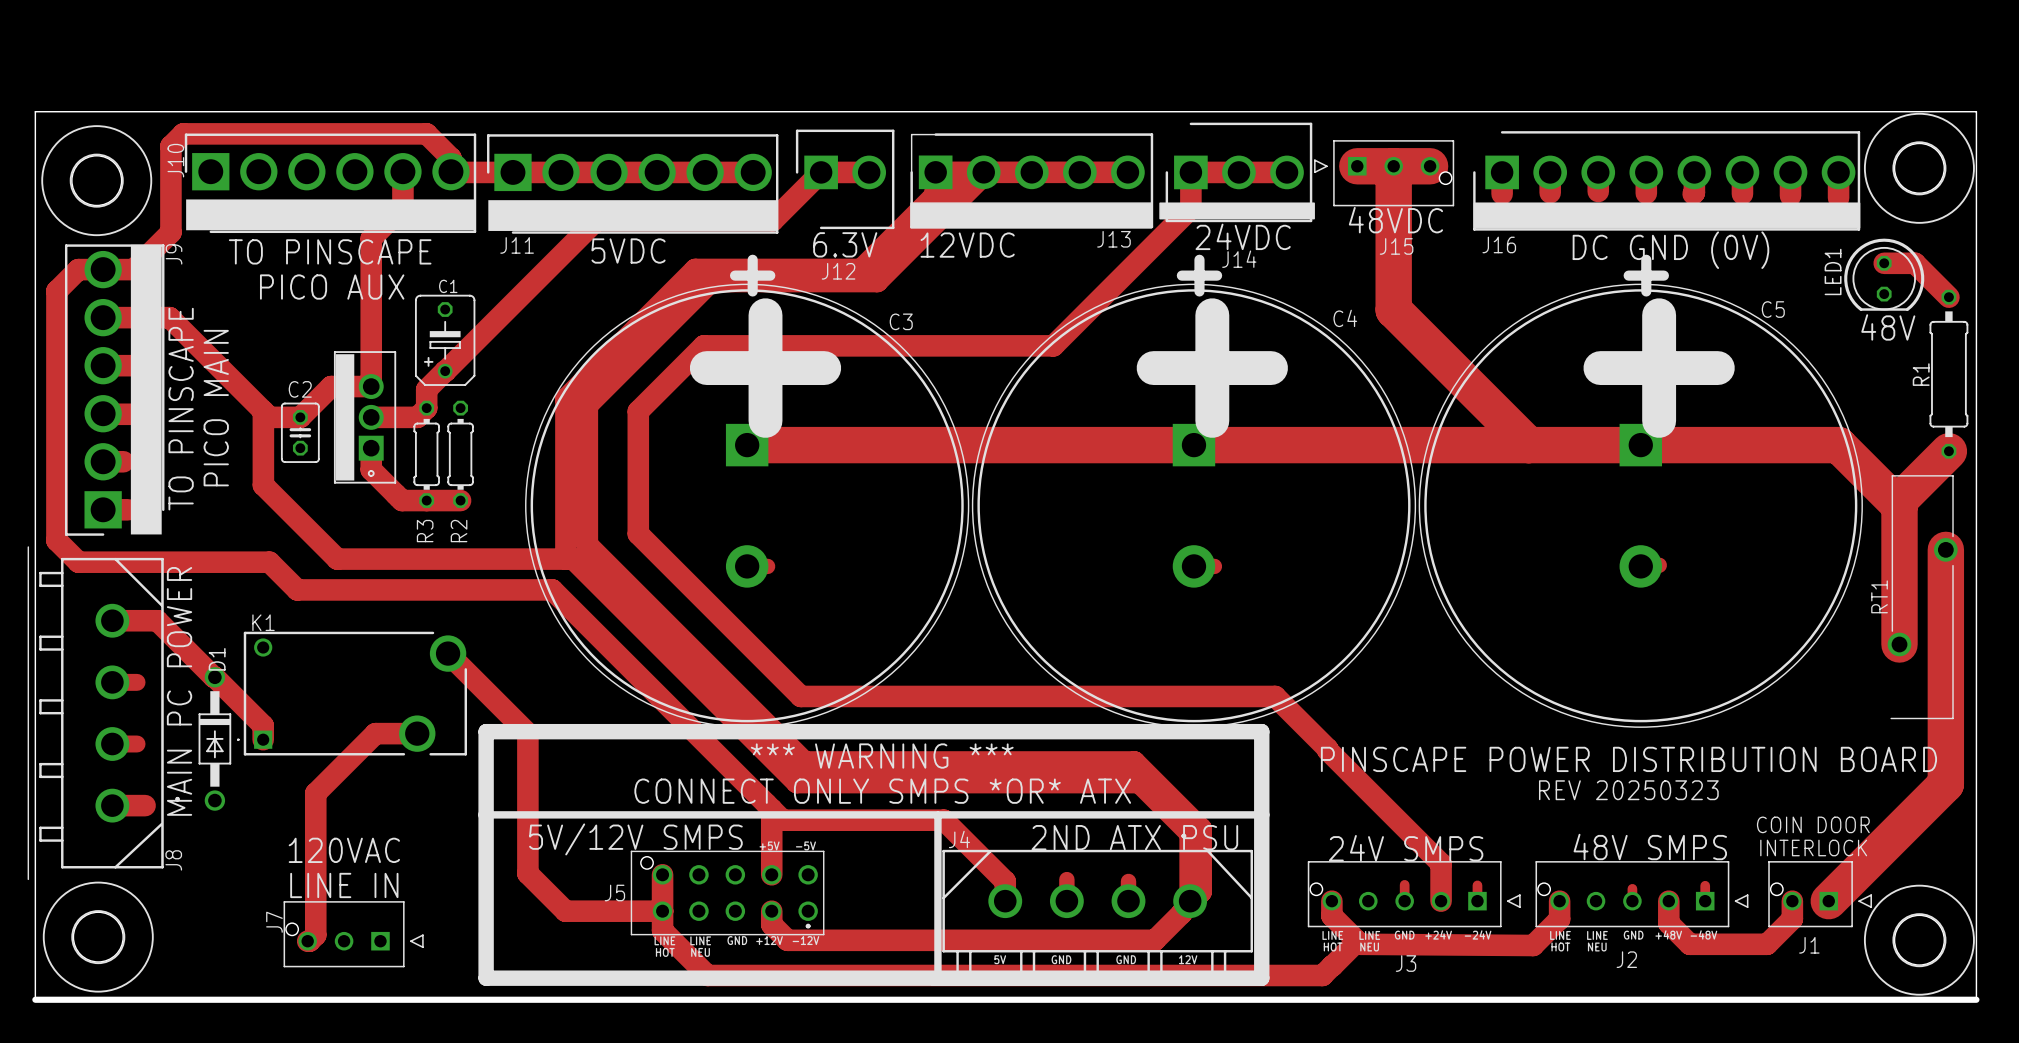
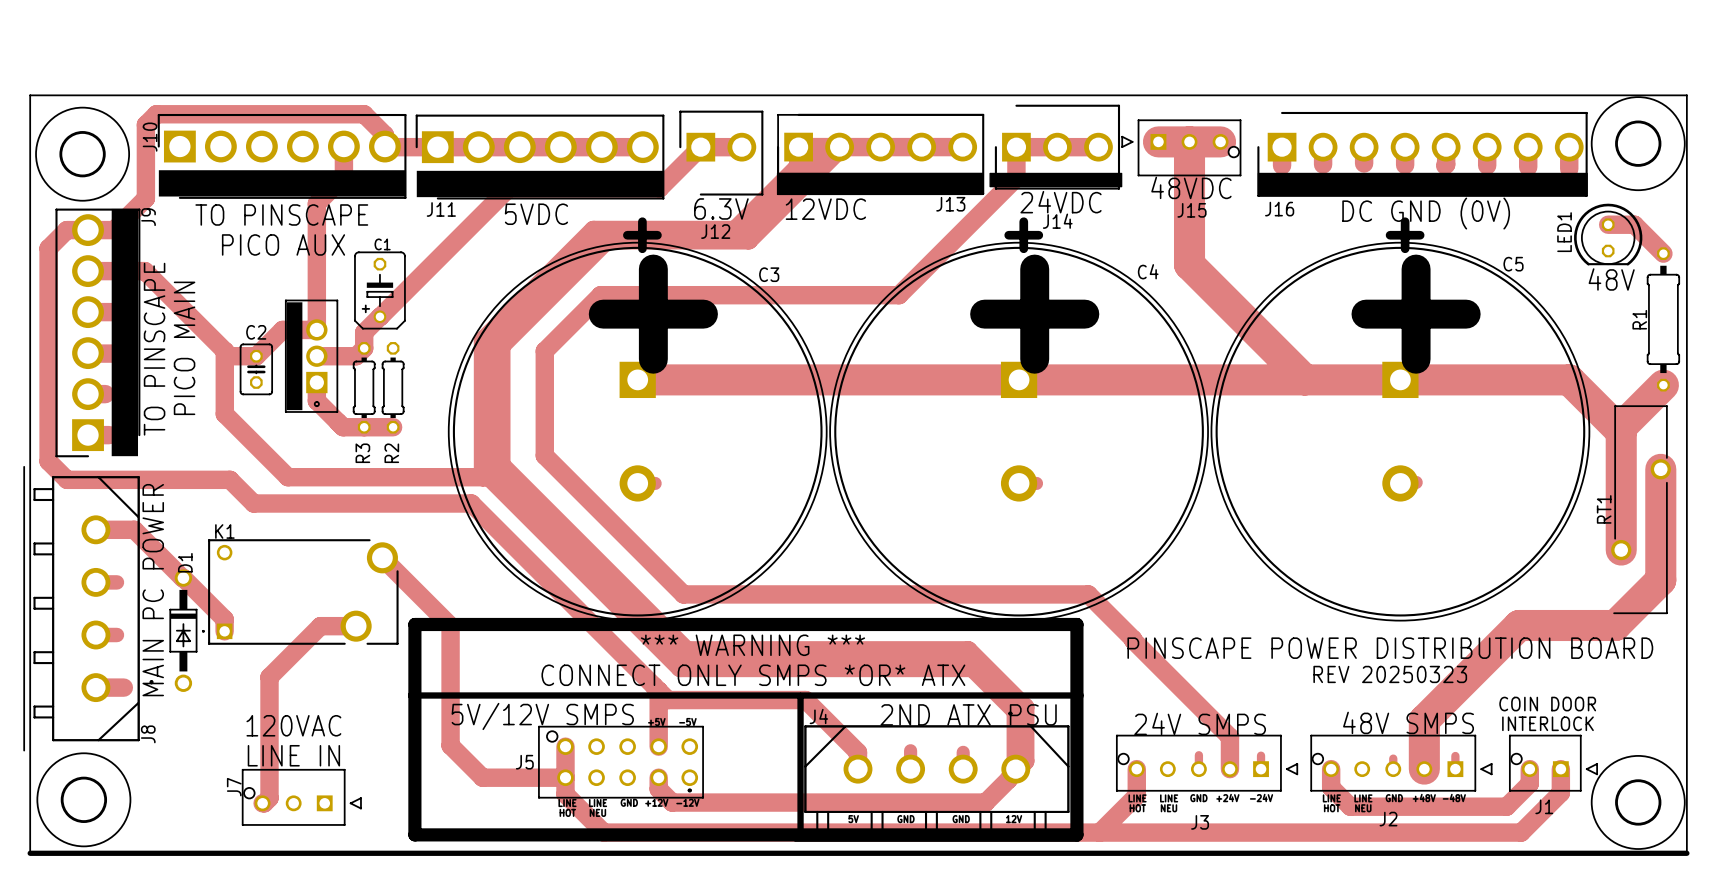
track: (1945, 679) (1945, 784) (1828, 901) -> (1660, 580) (1615, 625) (1519, 625) (1424, 720) (1424, 769)
track: (1668, 901) (1668, 923) (1689, 944) (1767, 944) (1792, 918) -> (1331, 784) (1331, 787) (1350, 806) (1506, 806) (1529, 783)
track: (1331, 915) (1360, 944) (1533, 945) (1559, 919) -> (1136, 781) (1136, 795) (1099, 832)
track: (1357, 941) (1322, 975) -> (1560, 769) (1560, 792) (1521, 832) (1128, 832)

